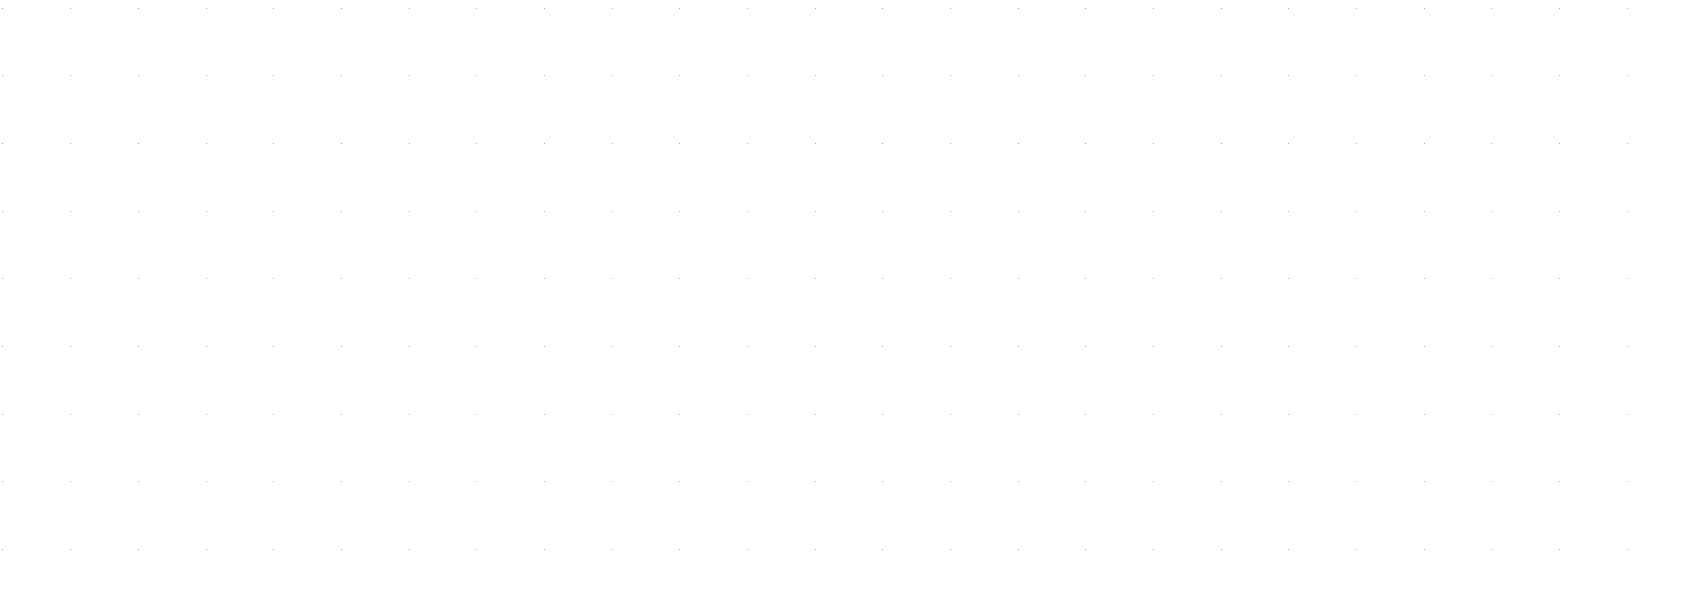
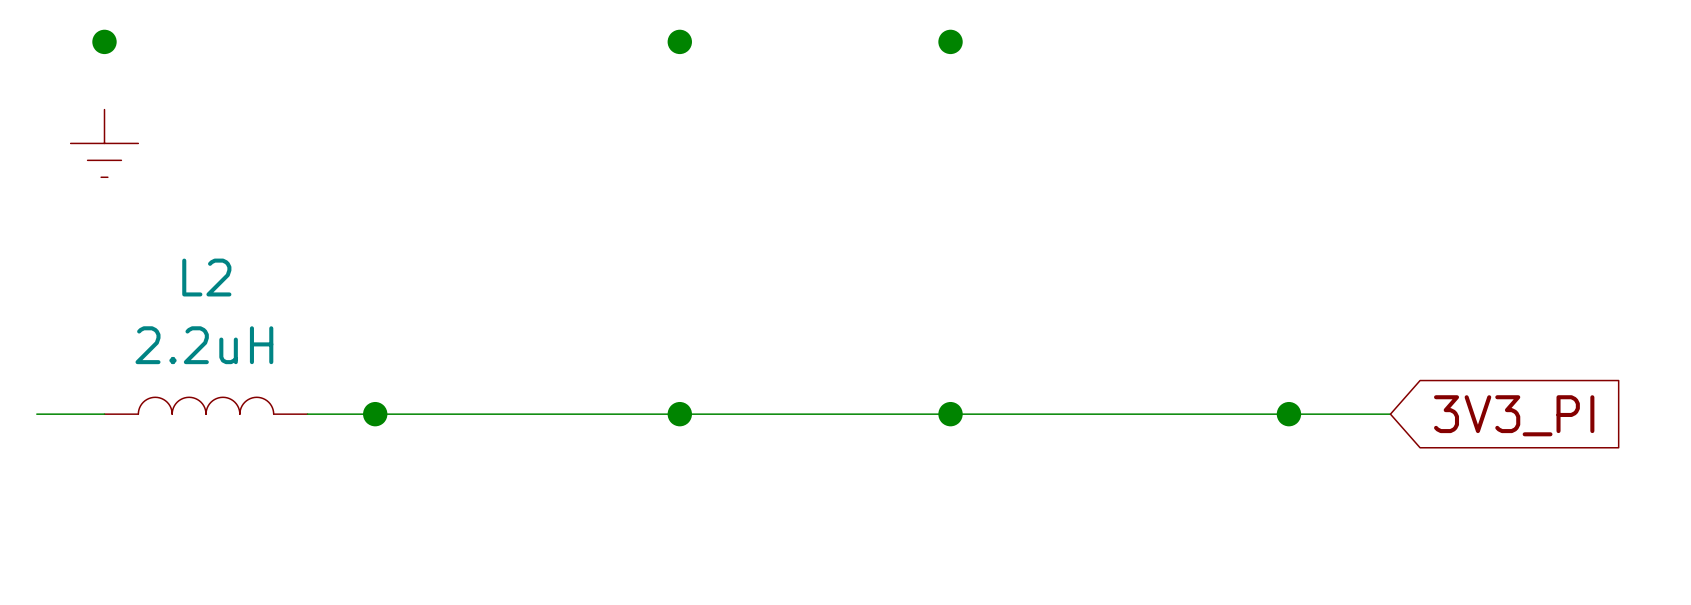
junction: none -> (104, 41)
junction: none -> (679, 41)
junction: none -> (950, 41)
power symbol: none -> (104, 143)
L2: none -> 2.2uH (206, 405)
wire: none -> (36, 414) (104, 414)
wire: none -> (307, 414) (1390, 414)
junction: none -> (375, 414)
junction: none -> (679, 414)
junction: none -> (950, 414)
junction: none -> (1288, 414)
global label: none -> 3V3_PI (1514, 415)

